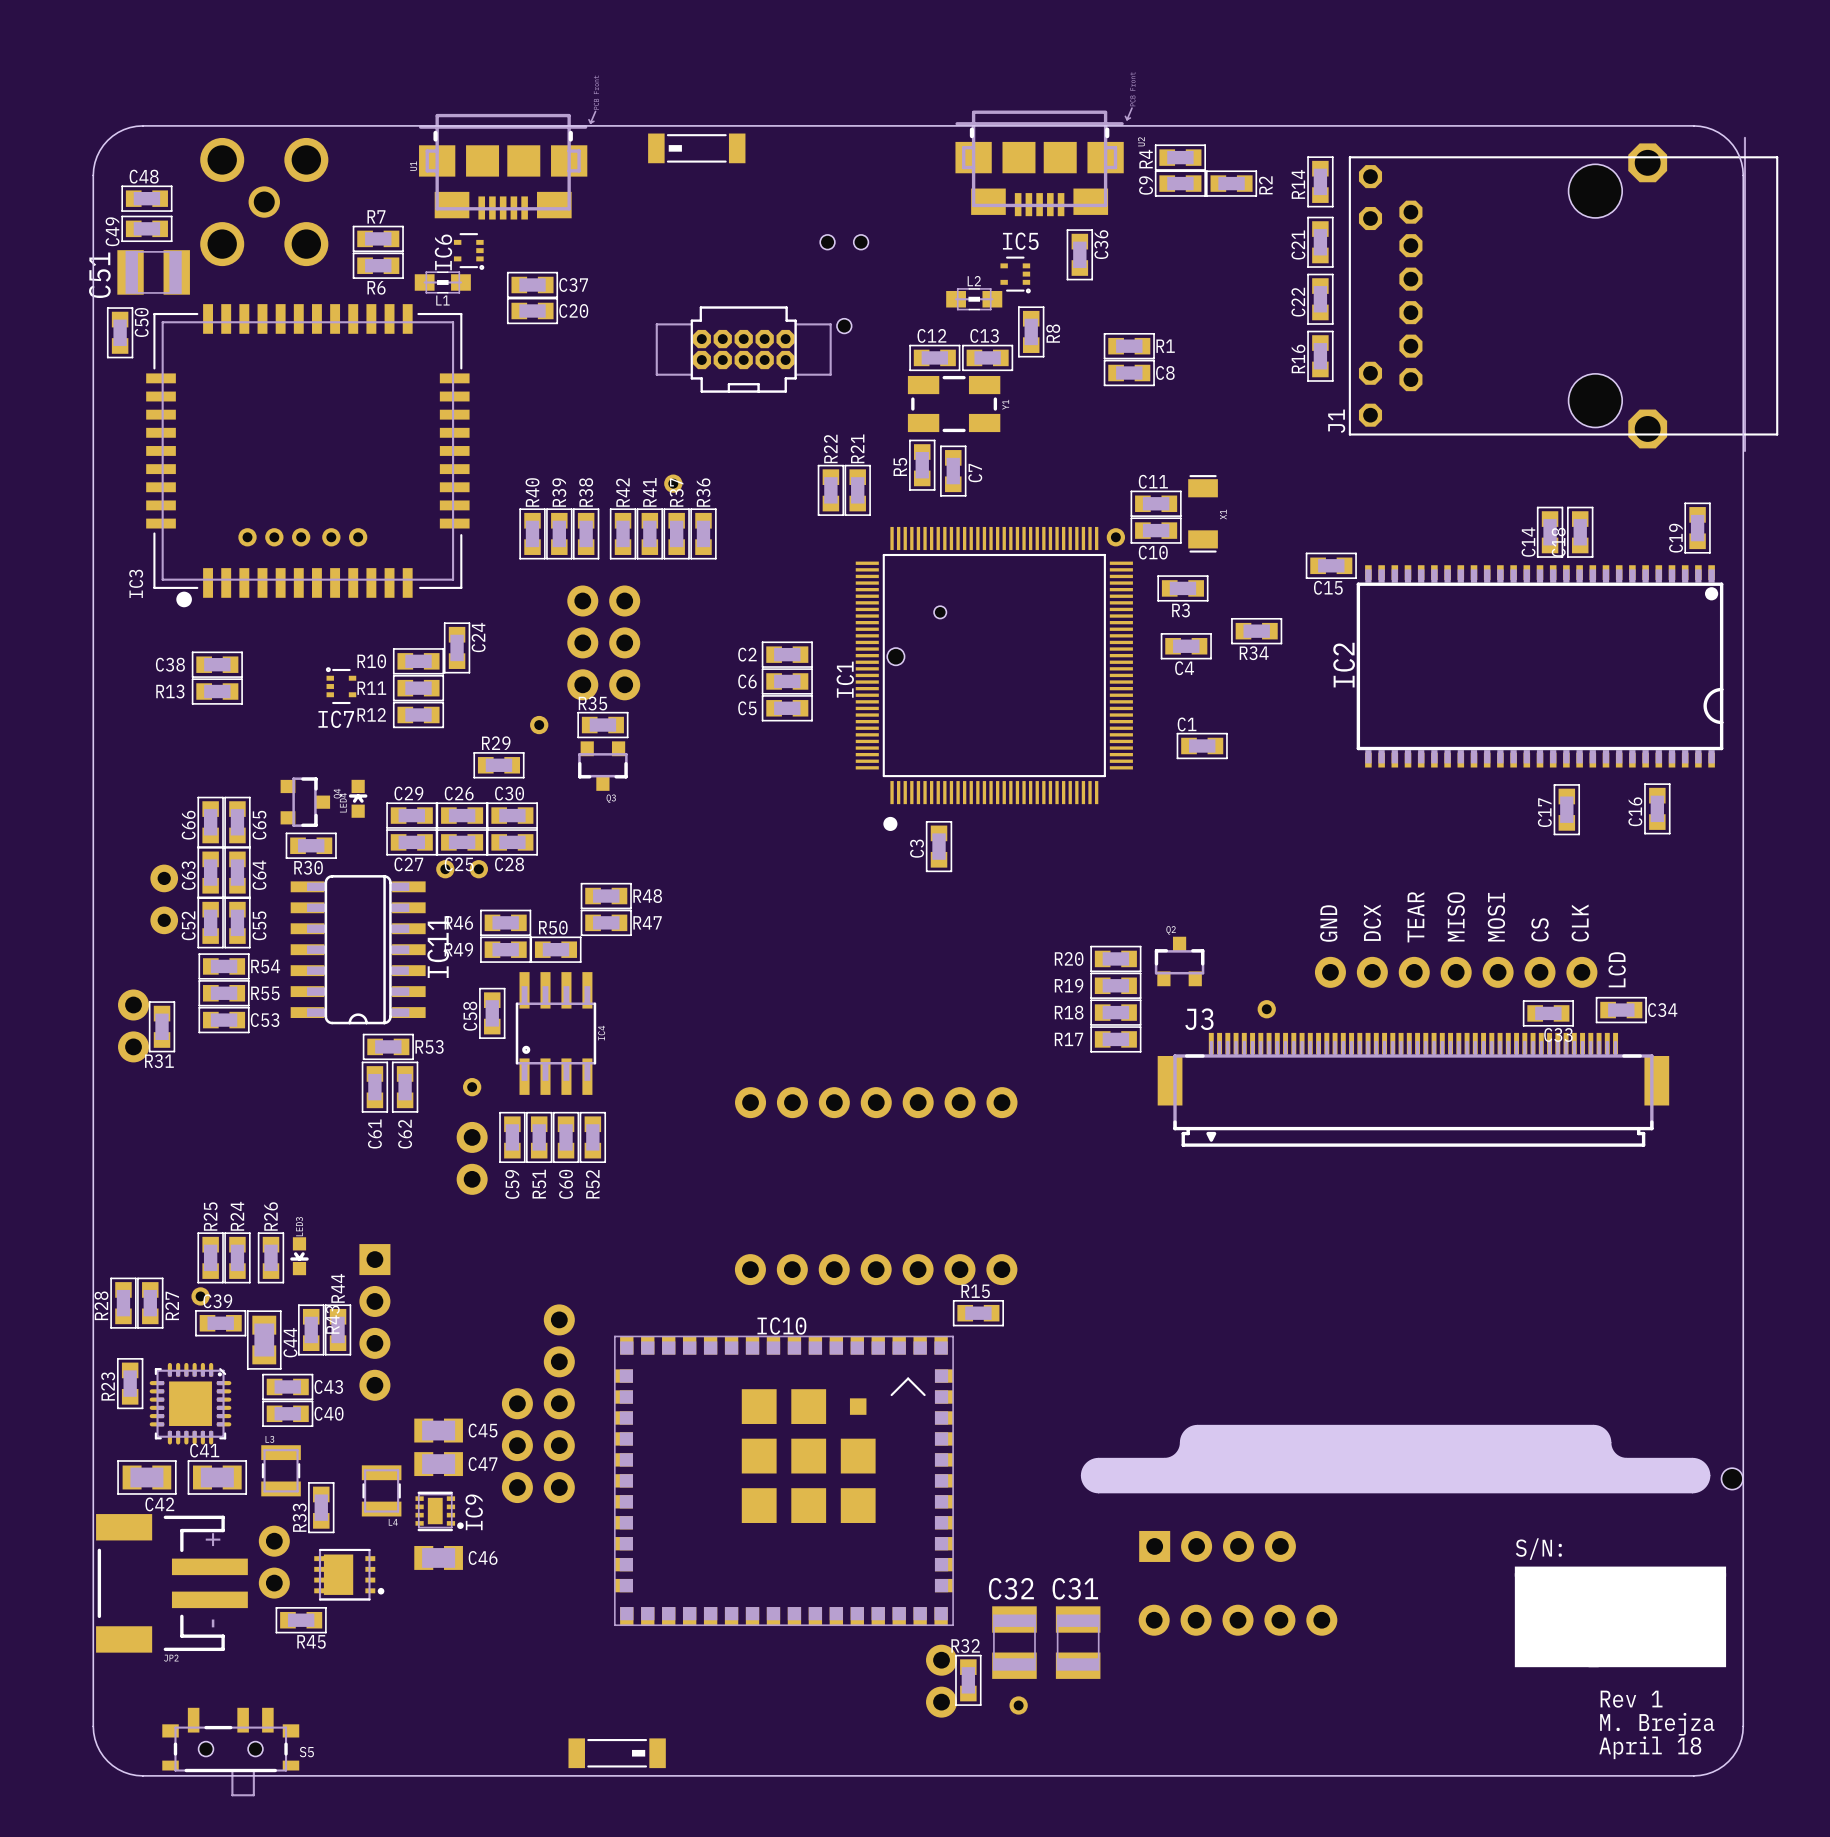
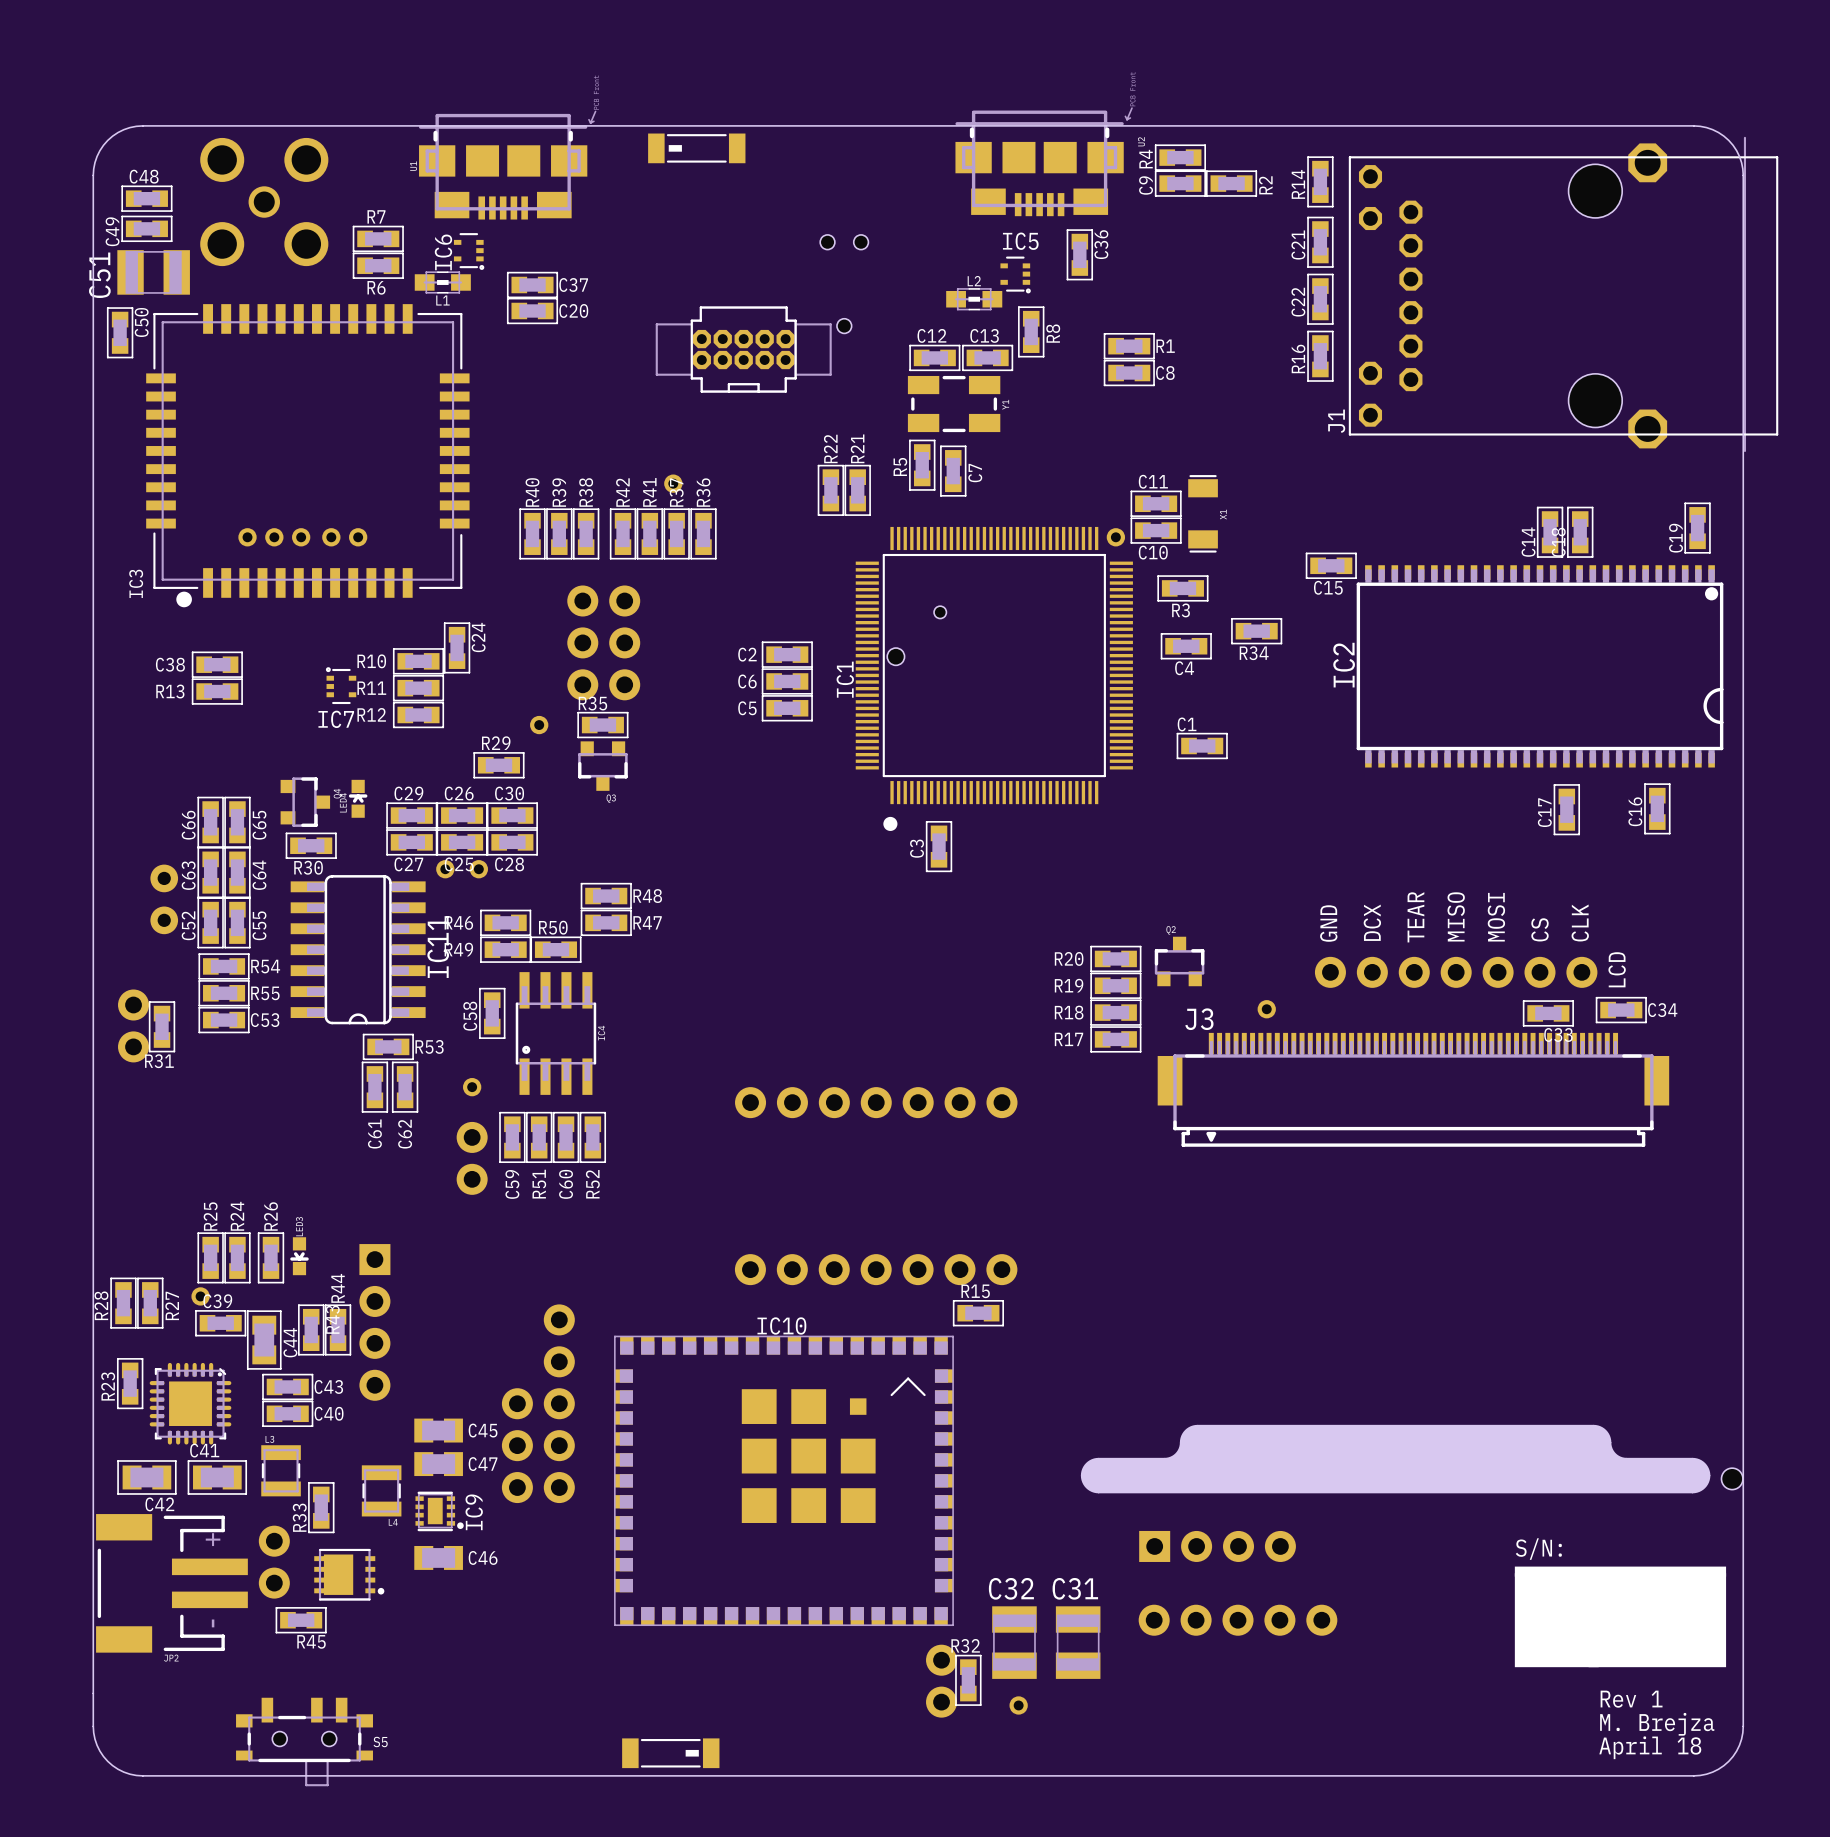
S5 position: (230, 1752) -> (304, 1742)
part position: (617, 1753) -> (670, 1753)

